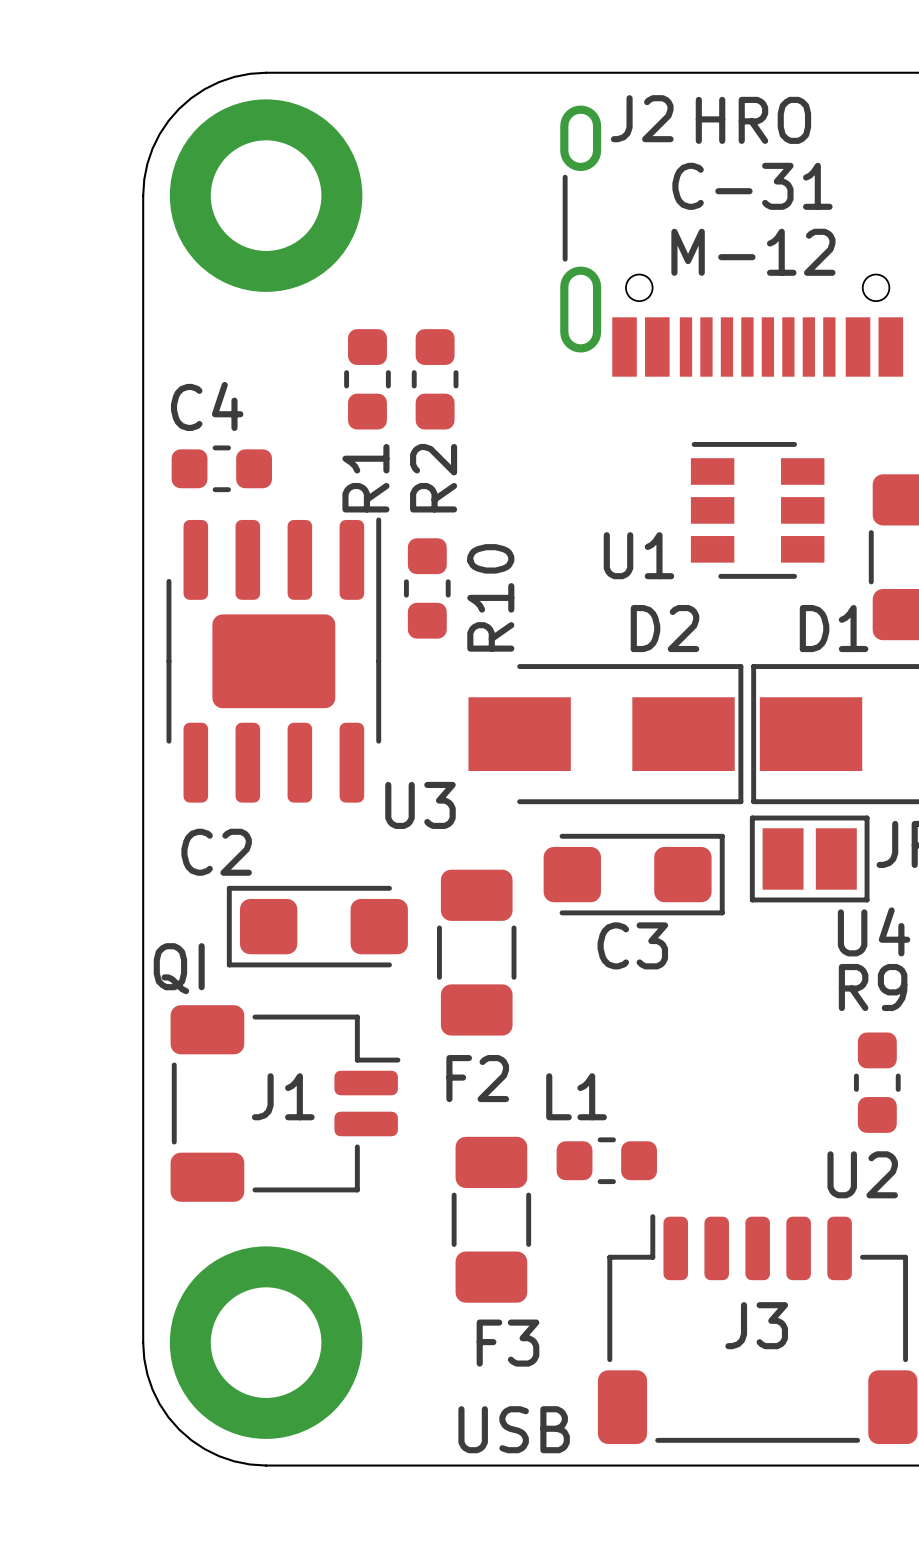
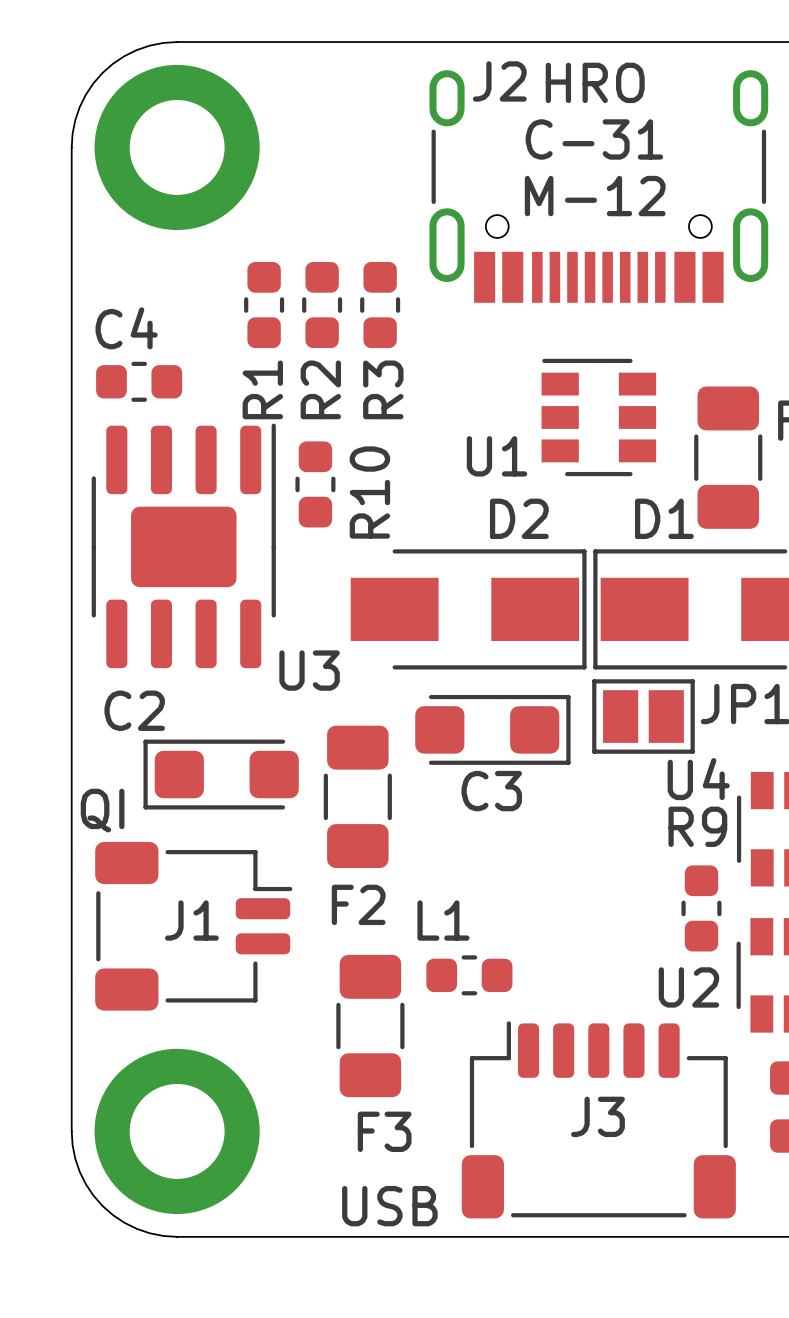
R3: none -> (380, 305)

